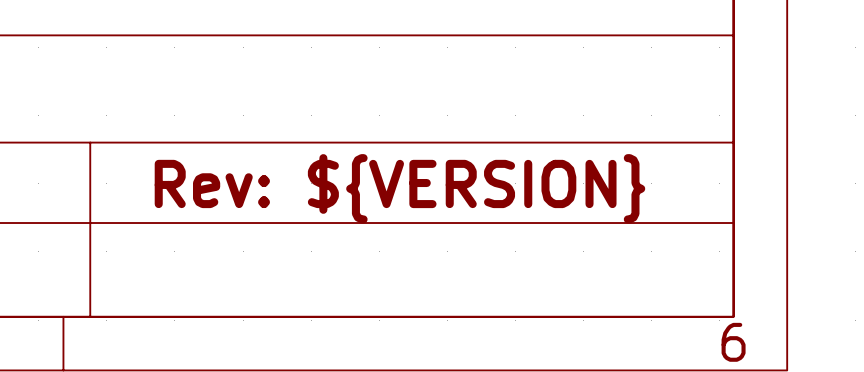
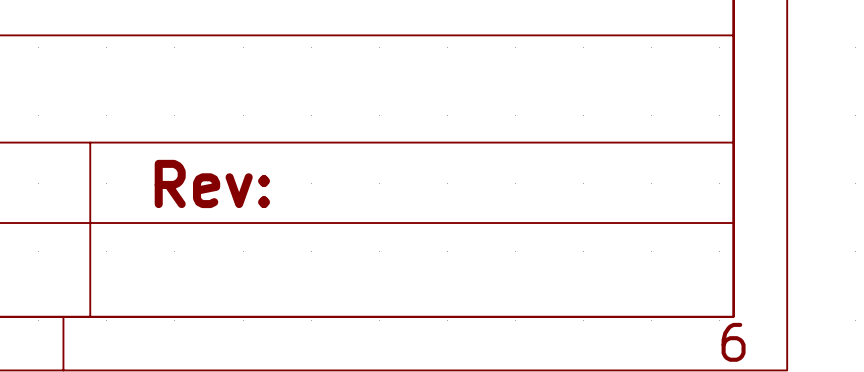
title block: Rev: ${VERSION} (399, 188) -> Rev: (212, 183)

